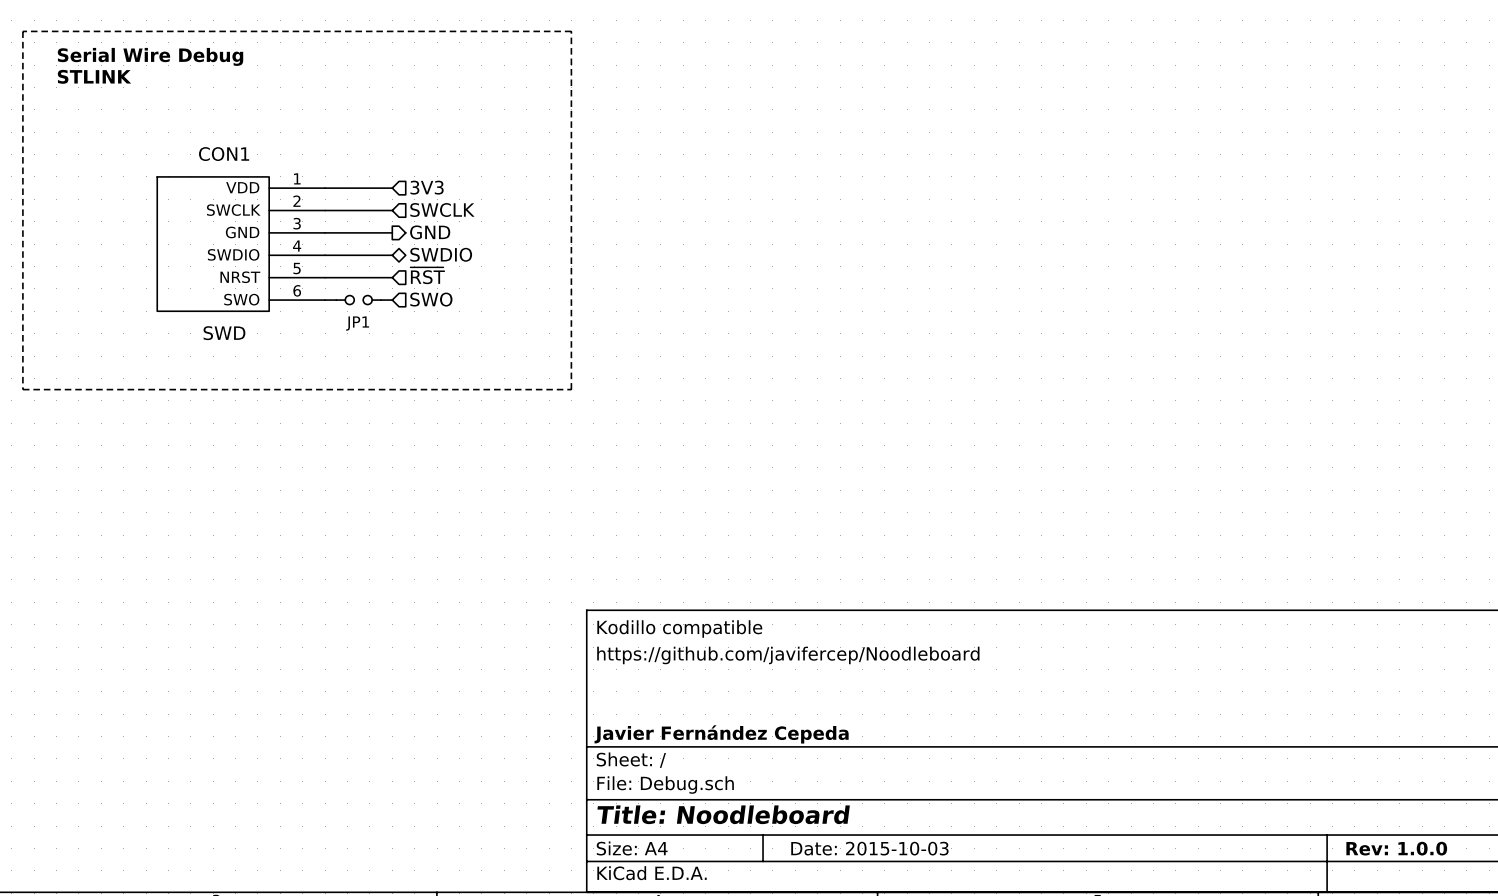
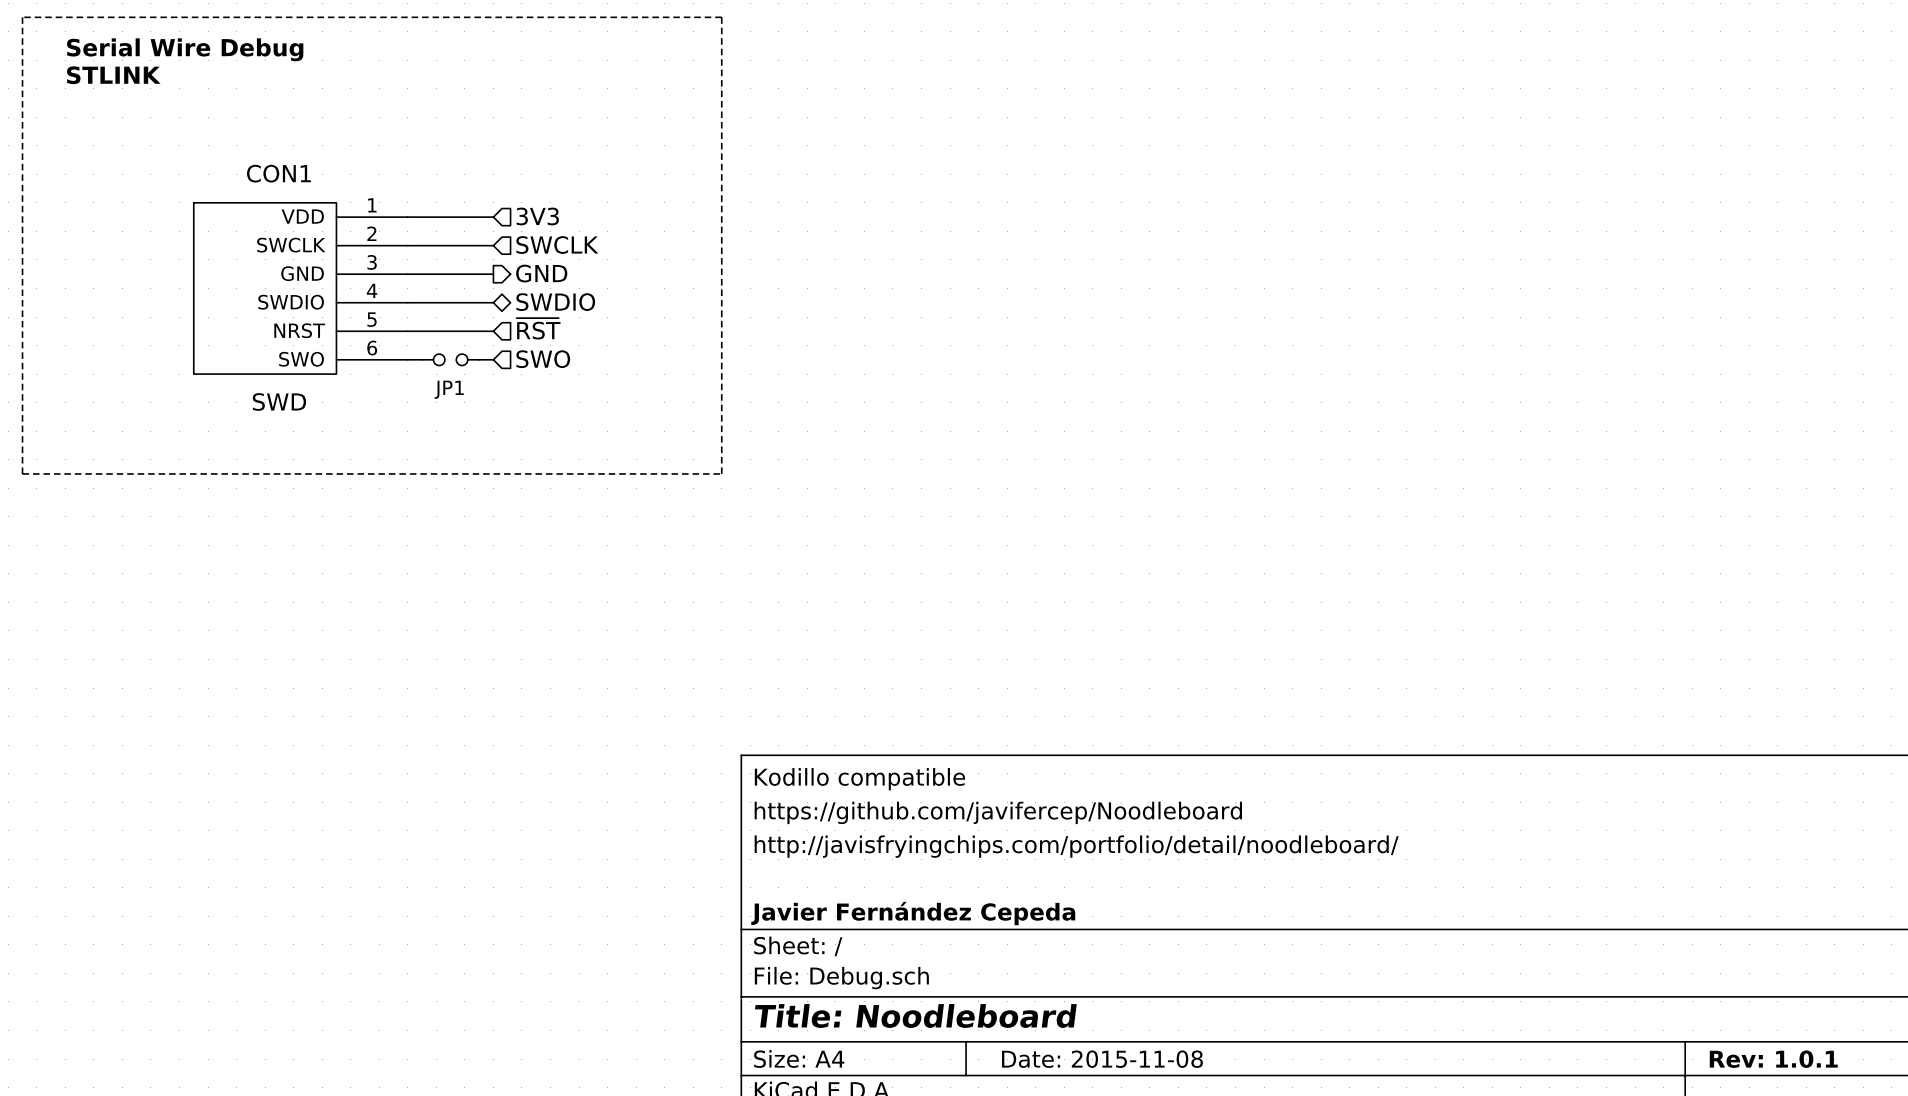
title block: none -> http://javisfryingchips.com/portfolio/detail/noodleboard/ (1076, 846)
title block: Date: 2015-10-03 (869, 848) -> Date: 2015-11-08 (1102, 1059)
title block: Rev: 1.0.0 (1396, 848) -> Rev: 1.0.1 (1773, 1059)

